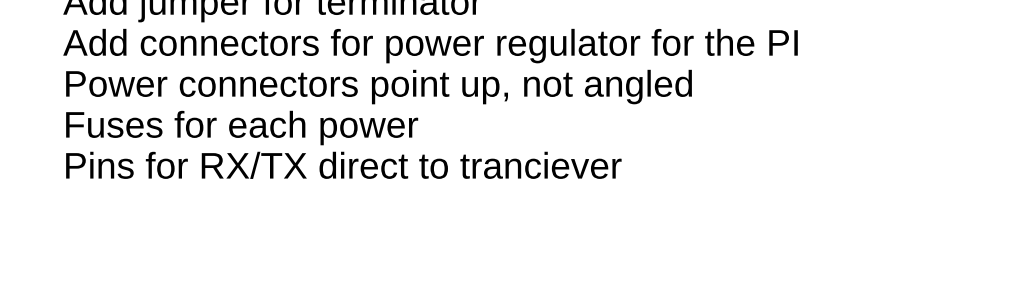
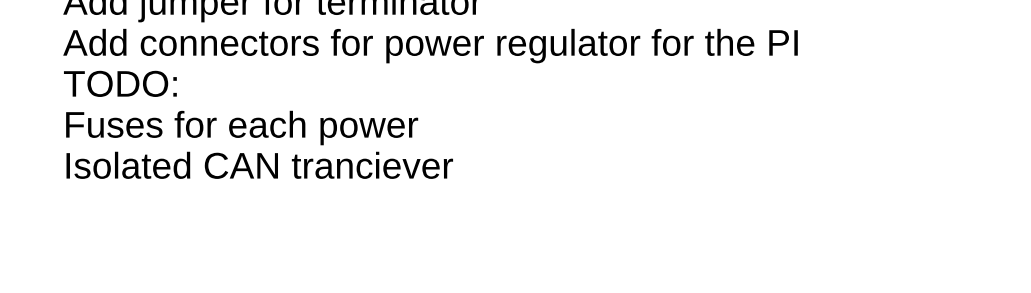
text: Power connectors point up, not angled (379, 87) -> TODO: (120, 83)
text: Pins for RX/TX direct to tranciever (343, 165) -> Isolated CAN tranciever (259, 165)

